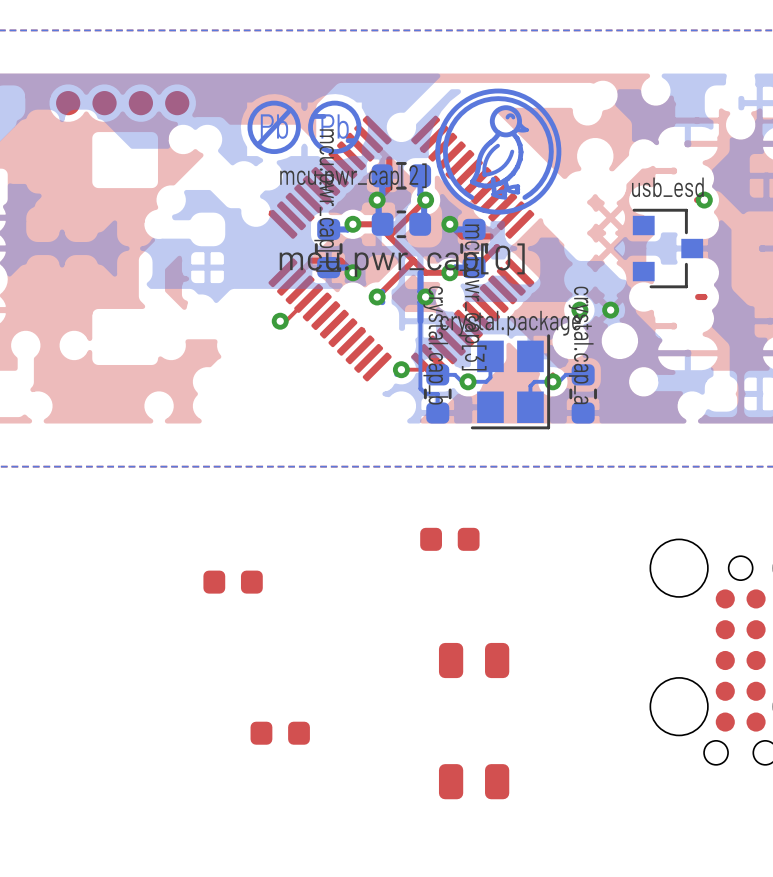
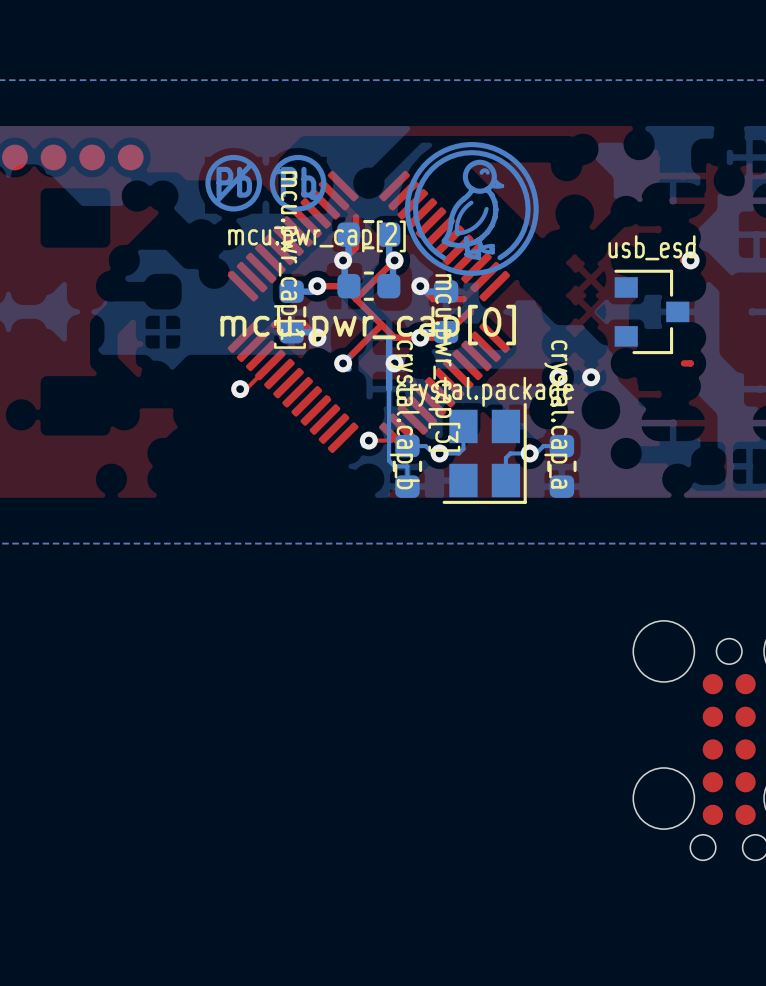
part: (449, 539) -> none
part: (233, 582) -> none
part: (474, 660) -> none
part: (280, 733) -> none
part: (474, 781) -> none

